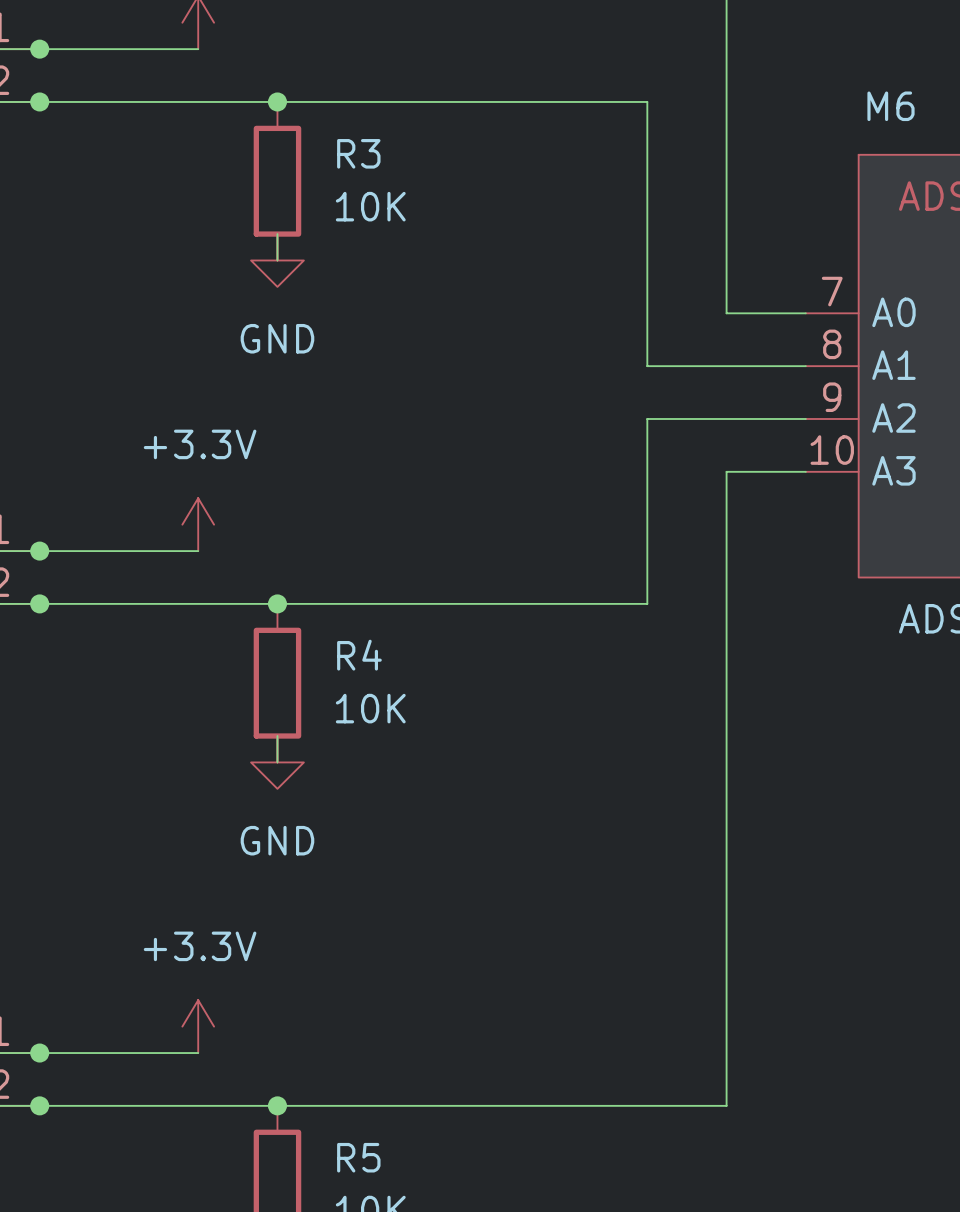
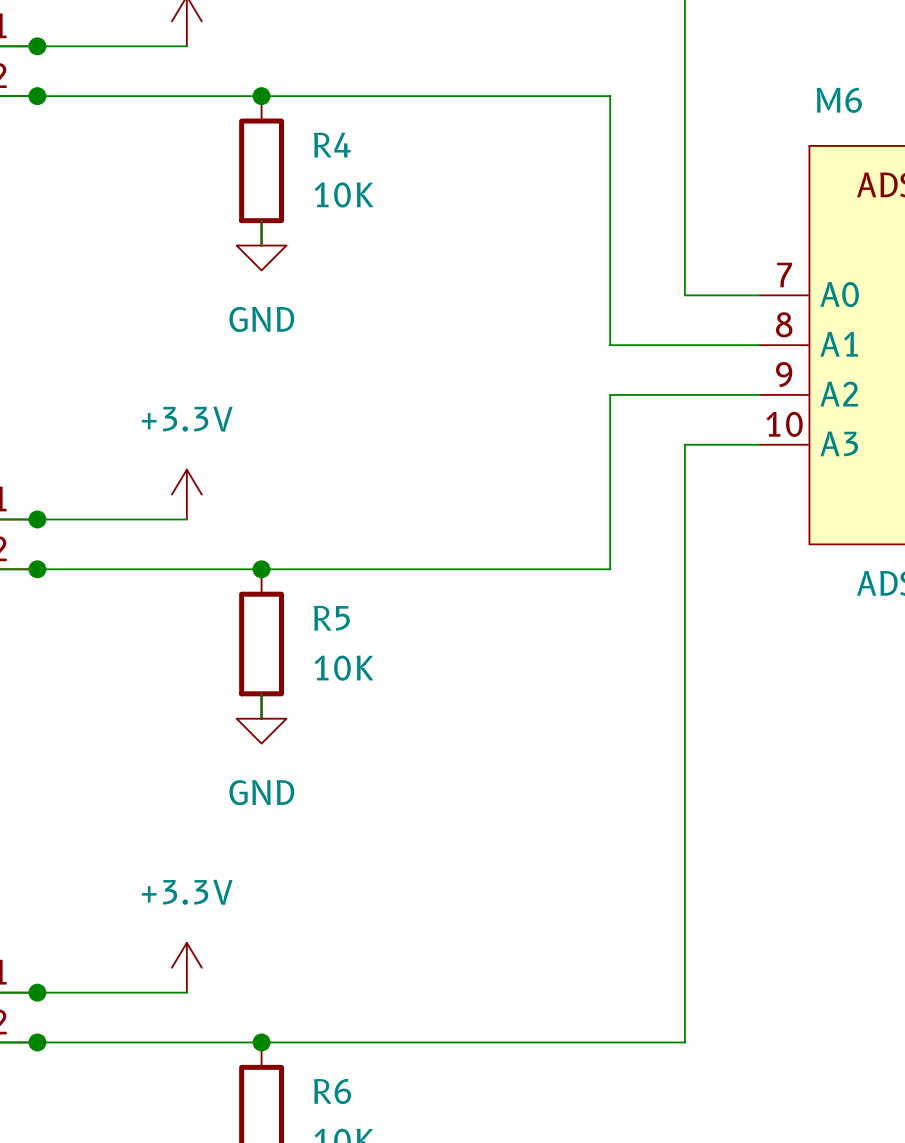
R3 name: R3 (358, 153) -> R4 (332, 145)
R4 name: R4 (359, 655) -> R5 (331, 618)
R5 name: R5 (358, 1157) -> R6 (332, 1091)

